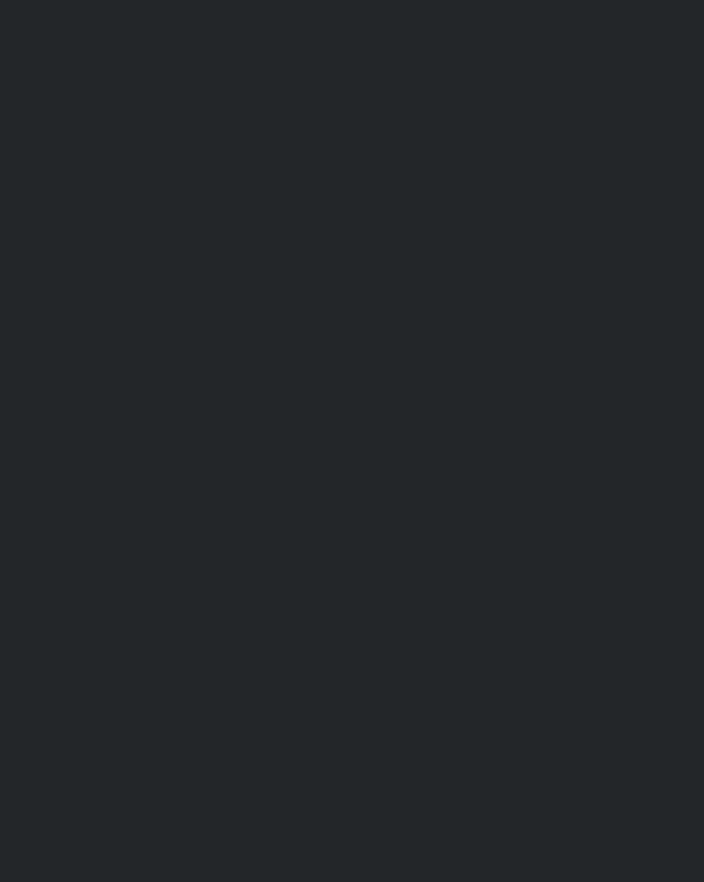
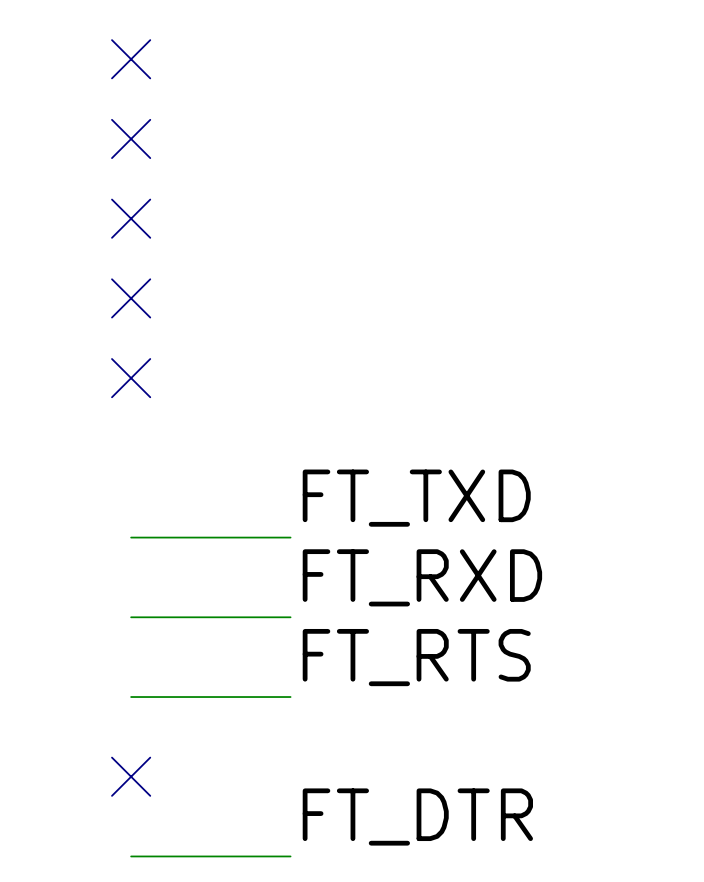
no-connect mark: none -> (131, 59)
no-connect mark: none -> (131, 138)
no-connect mark: none -> (131, 218)
no-connect mark: none -> (131, 298)
no-connect mark: none -> (131, 378)
label: none -> FT_TXD (416, 498)
wire: none -> (131, 537) (290, 537)
label: none -> FT_RXD (422, 577)
wire: none -> (131, 617) (290, 617)
label: none -> FT_RTS (416, 657)
wire: none -> (131, 697) (290, 697)
no-connect mark: none -> (131, 776)
label: none -> FT_DTR (417, 817)
wire: none -> (131, 856) (290, 856)

